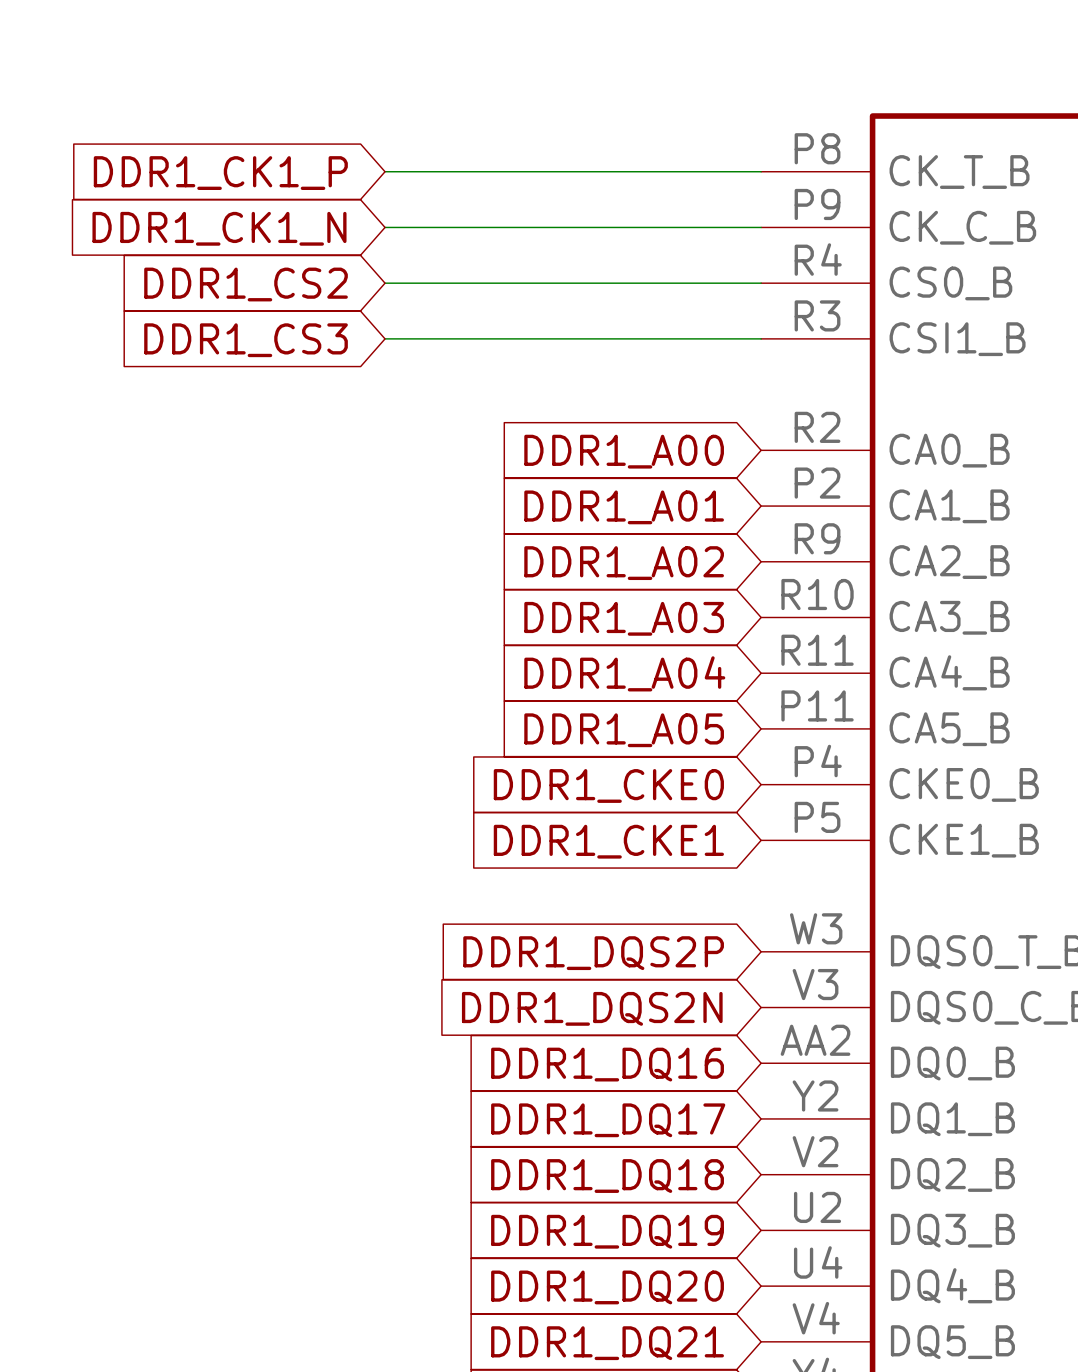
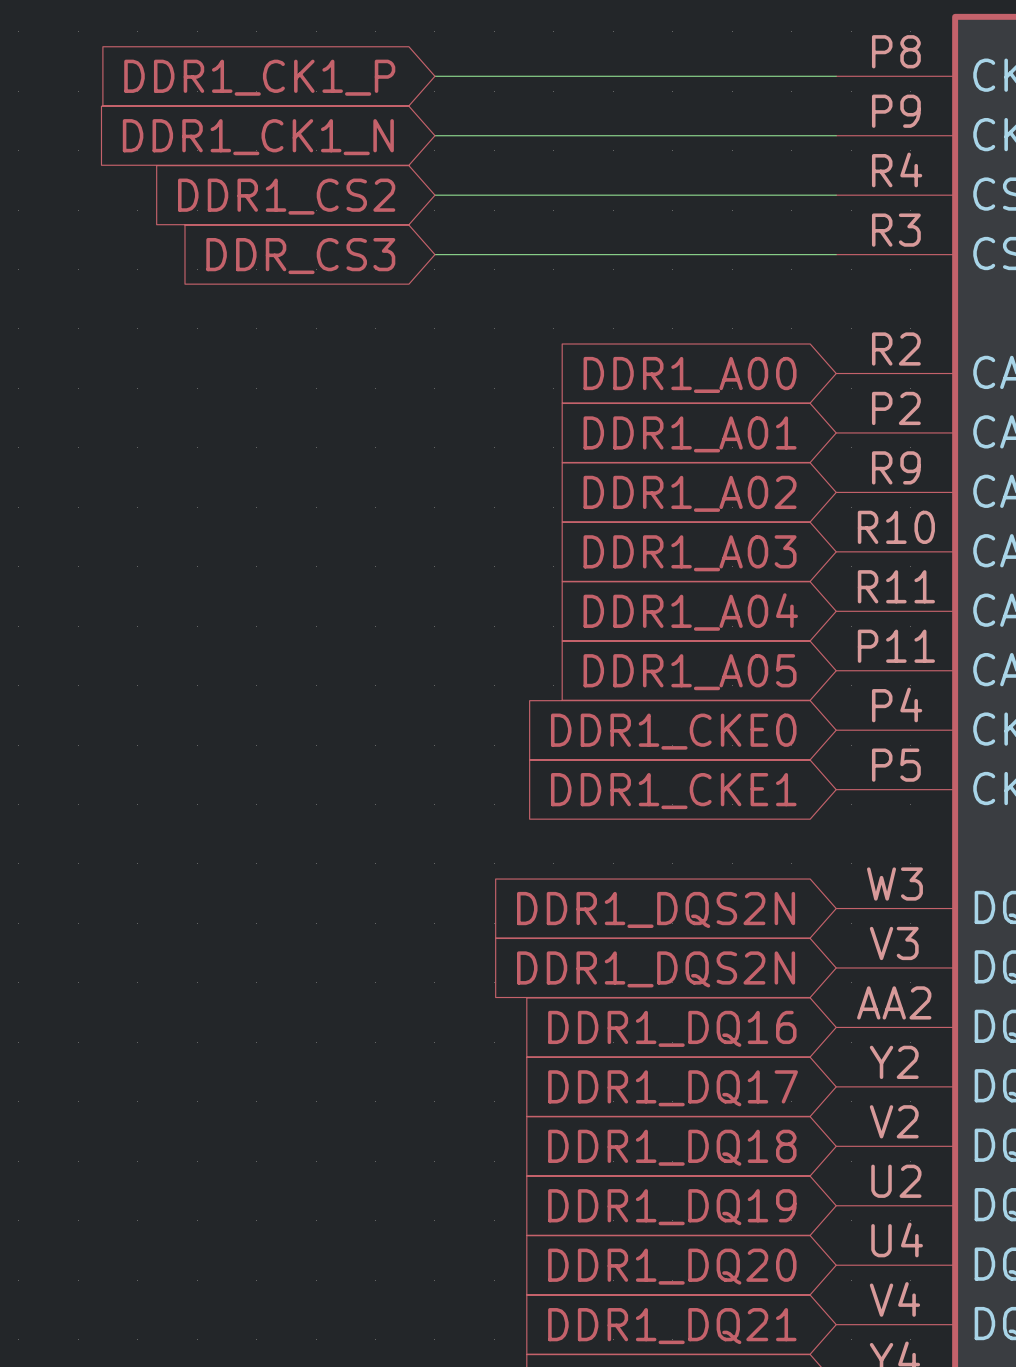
global label: DDR1_CS3 (246, 340) -> DDR_CS3 (300, 256)
global label: DDR1_DQS2P (593, 953) -> DDR1_DQS2N (656, 909)

